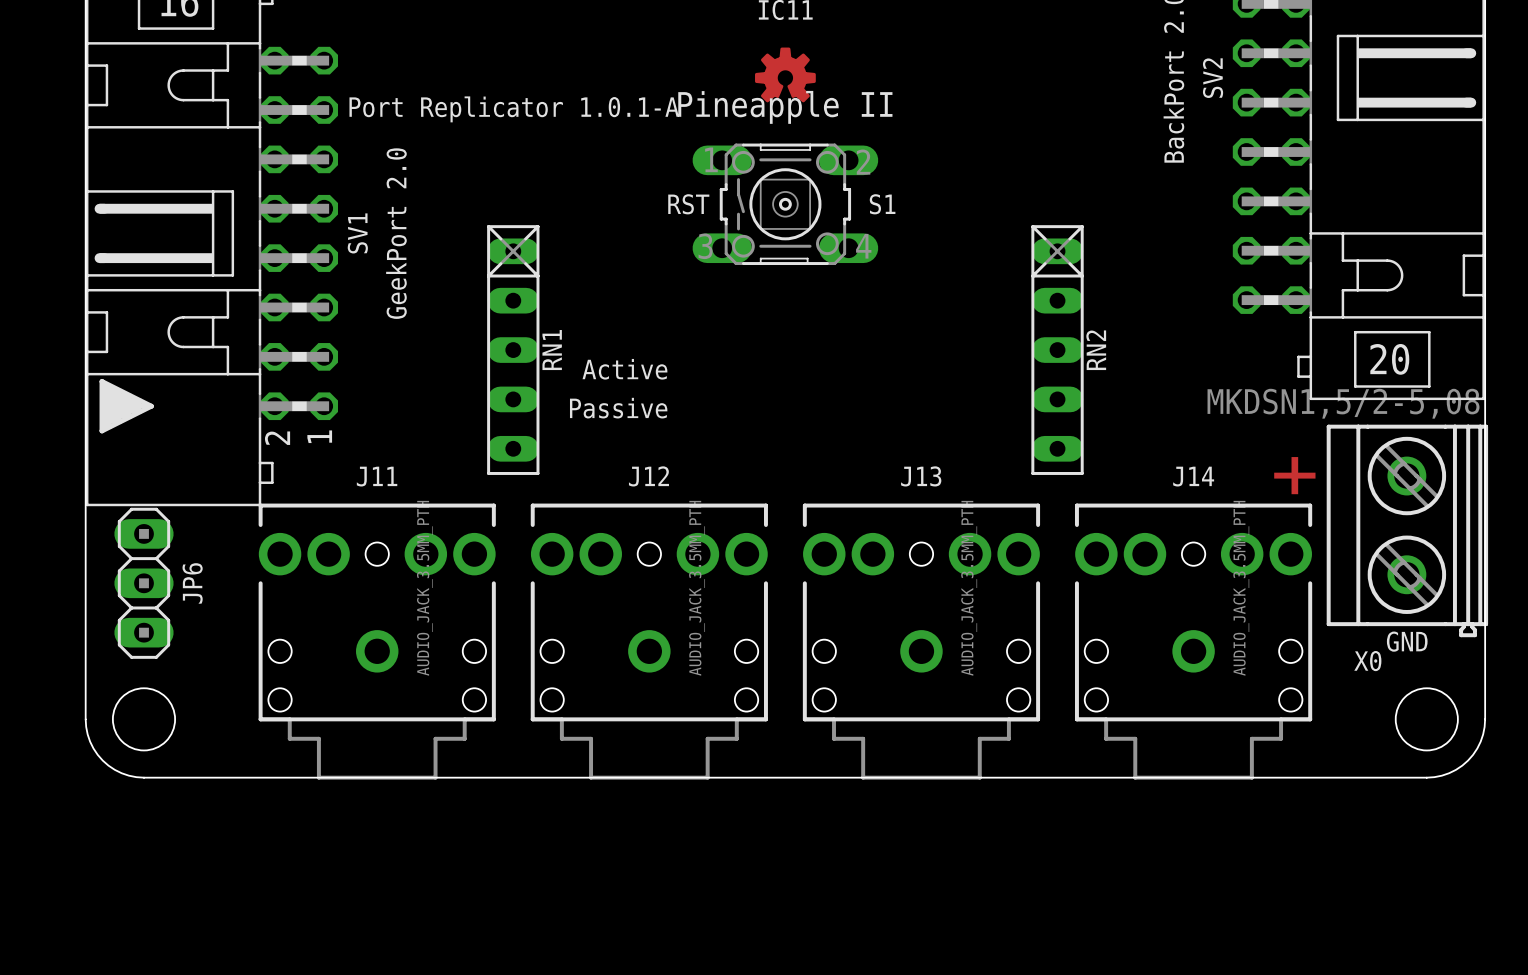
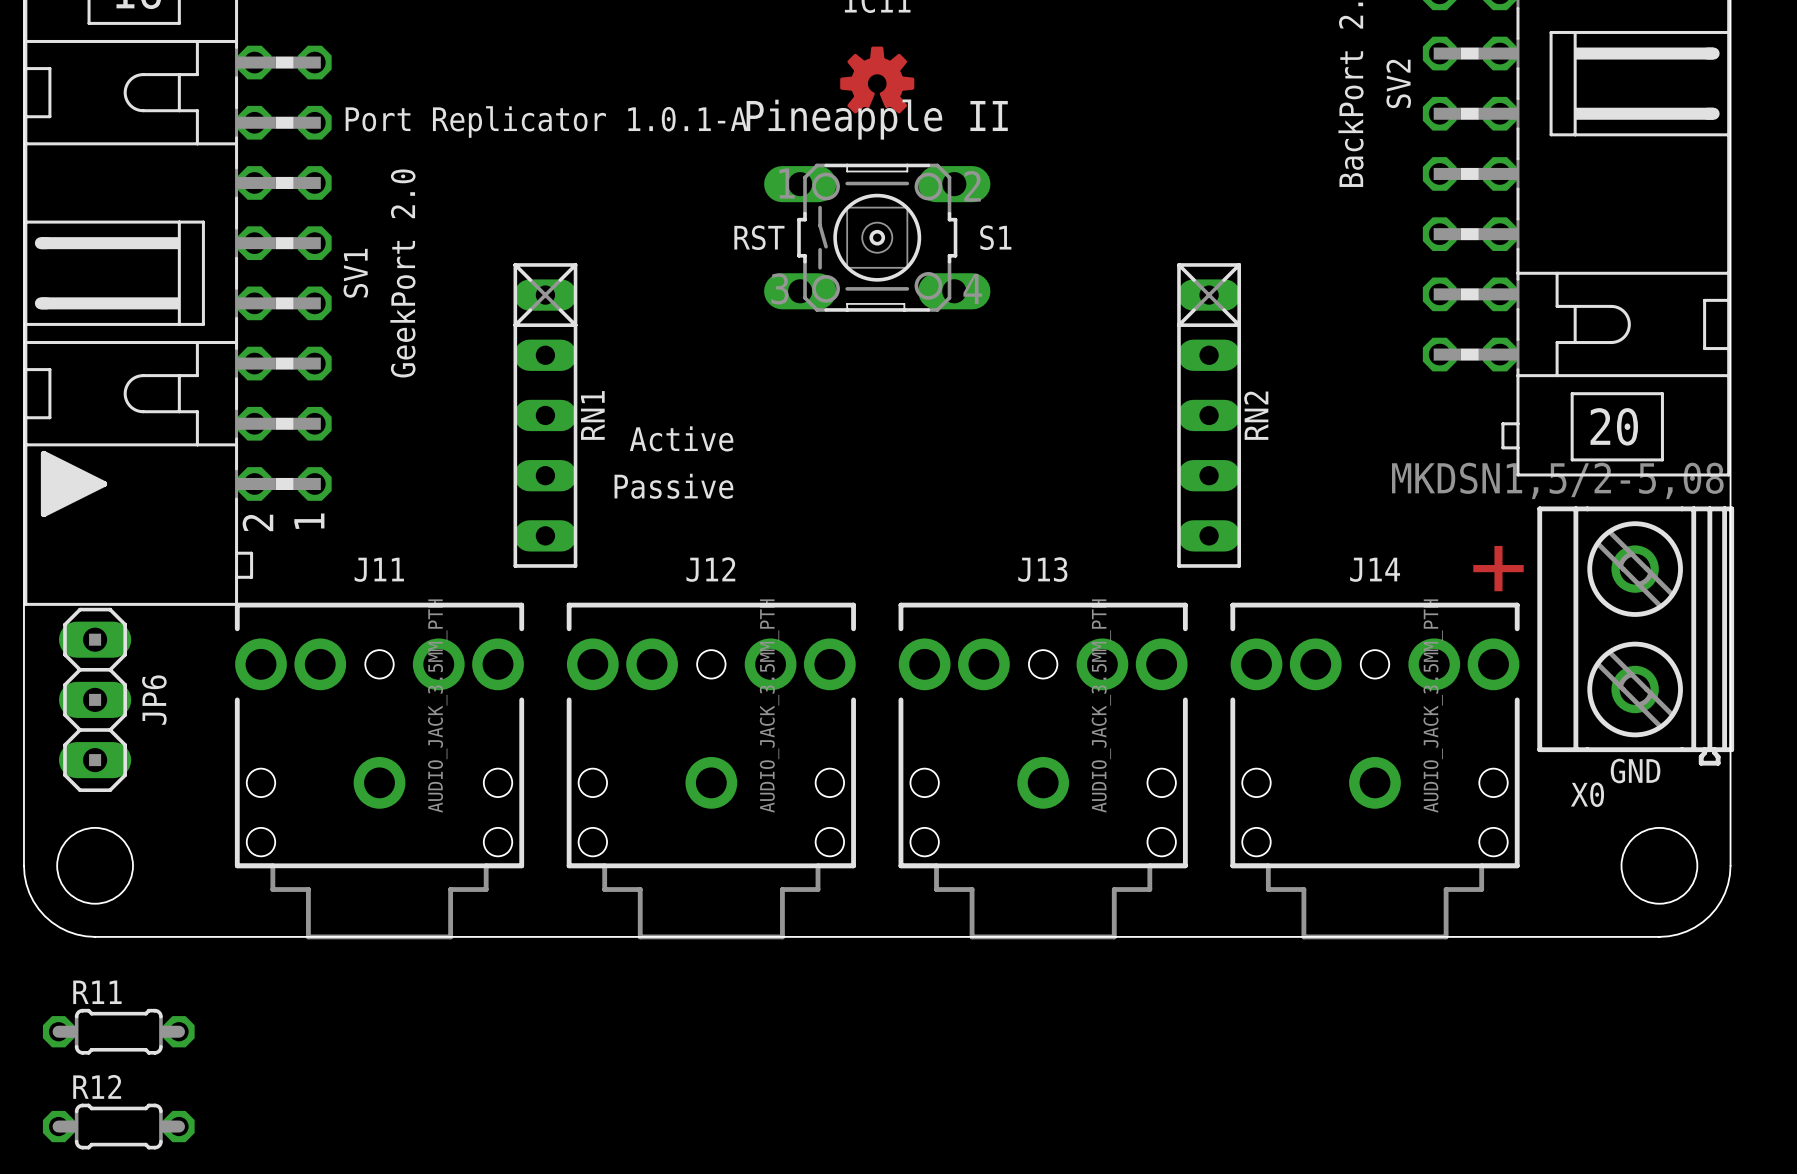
R11: none -> (118, 1031)
R12: none -> (118, 1126)

